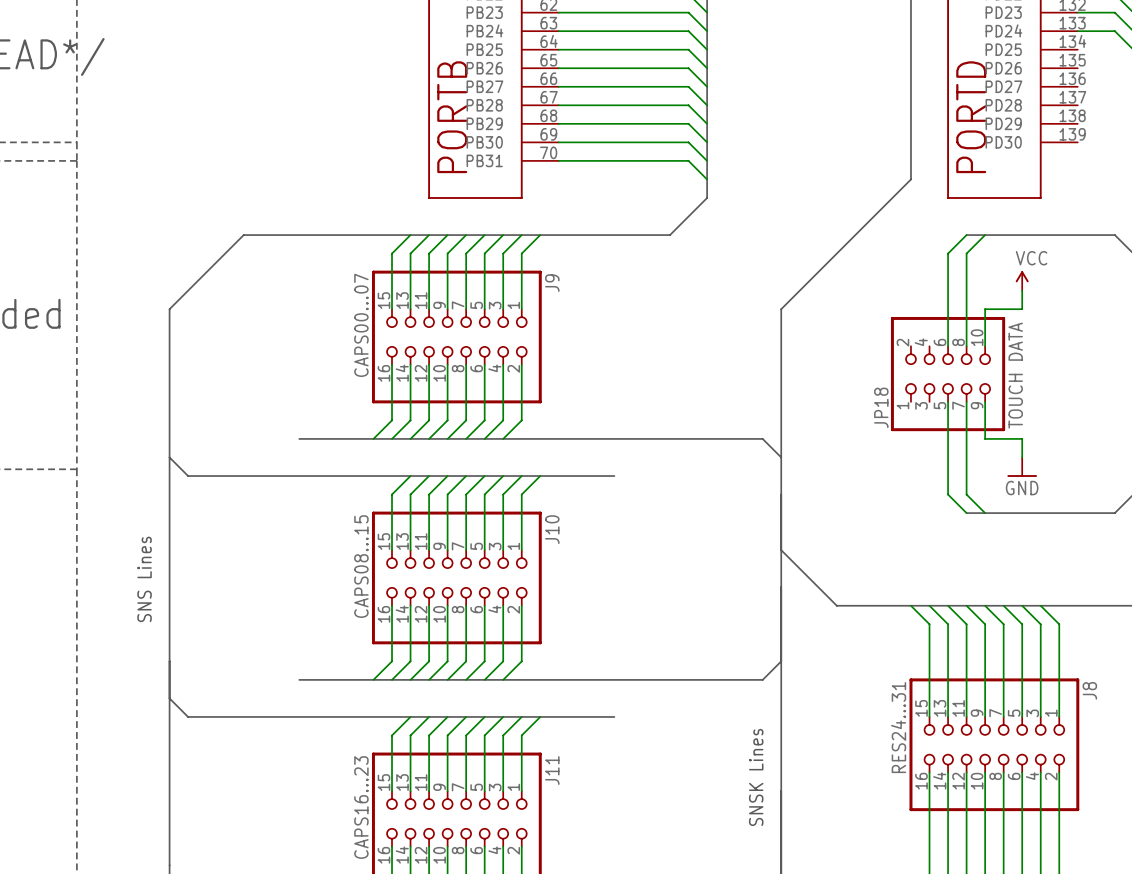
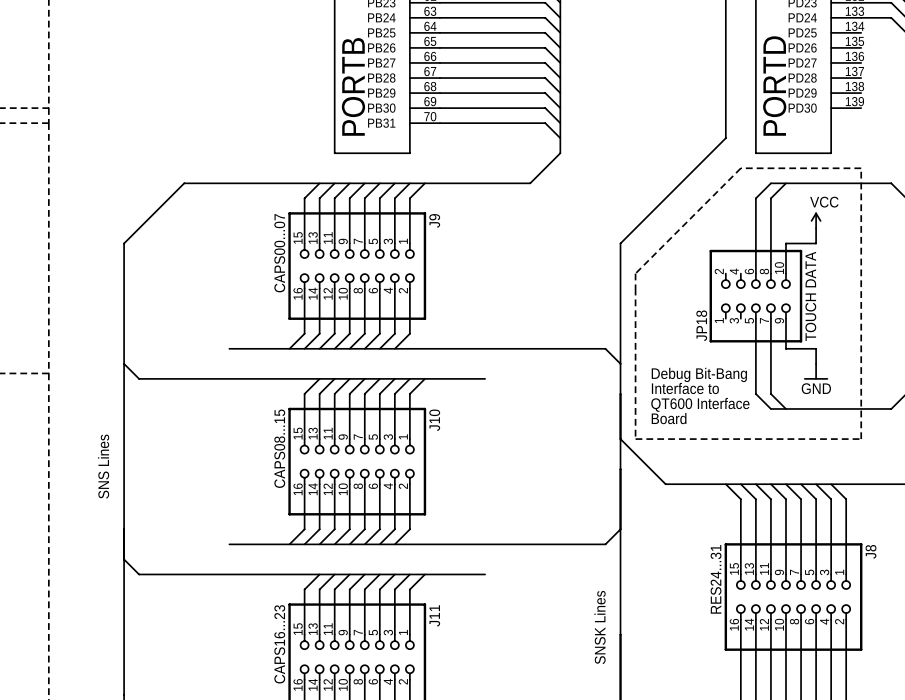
line: none -> (740, 168) (861, 168) (861, 439) (635, 439) (635, 273) (740, 168)
text: none -> Debug Bit-Bang (699, 374)
text: none -> Interface to (685, 388)
text: none -> QT600 Interface (700, 404)
text: none -> Board (669, 418)

